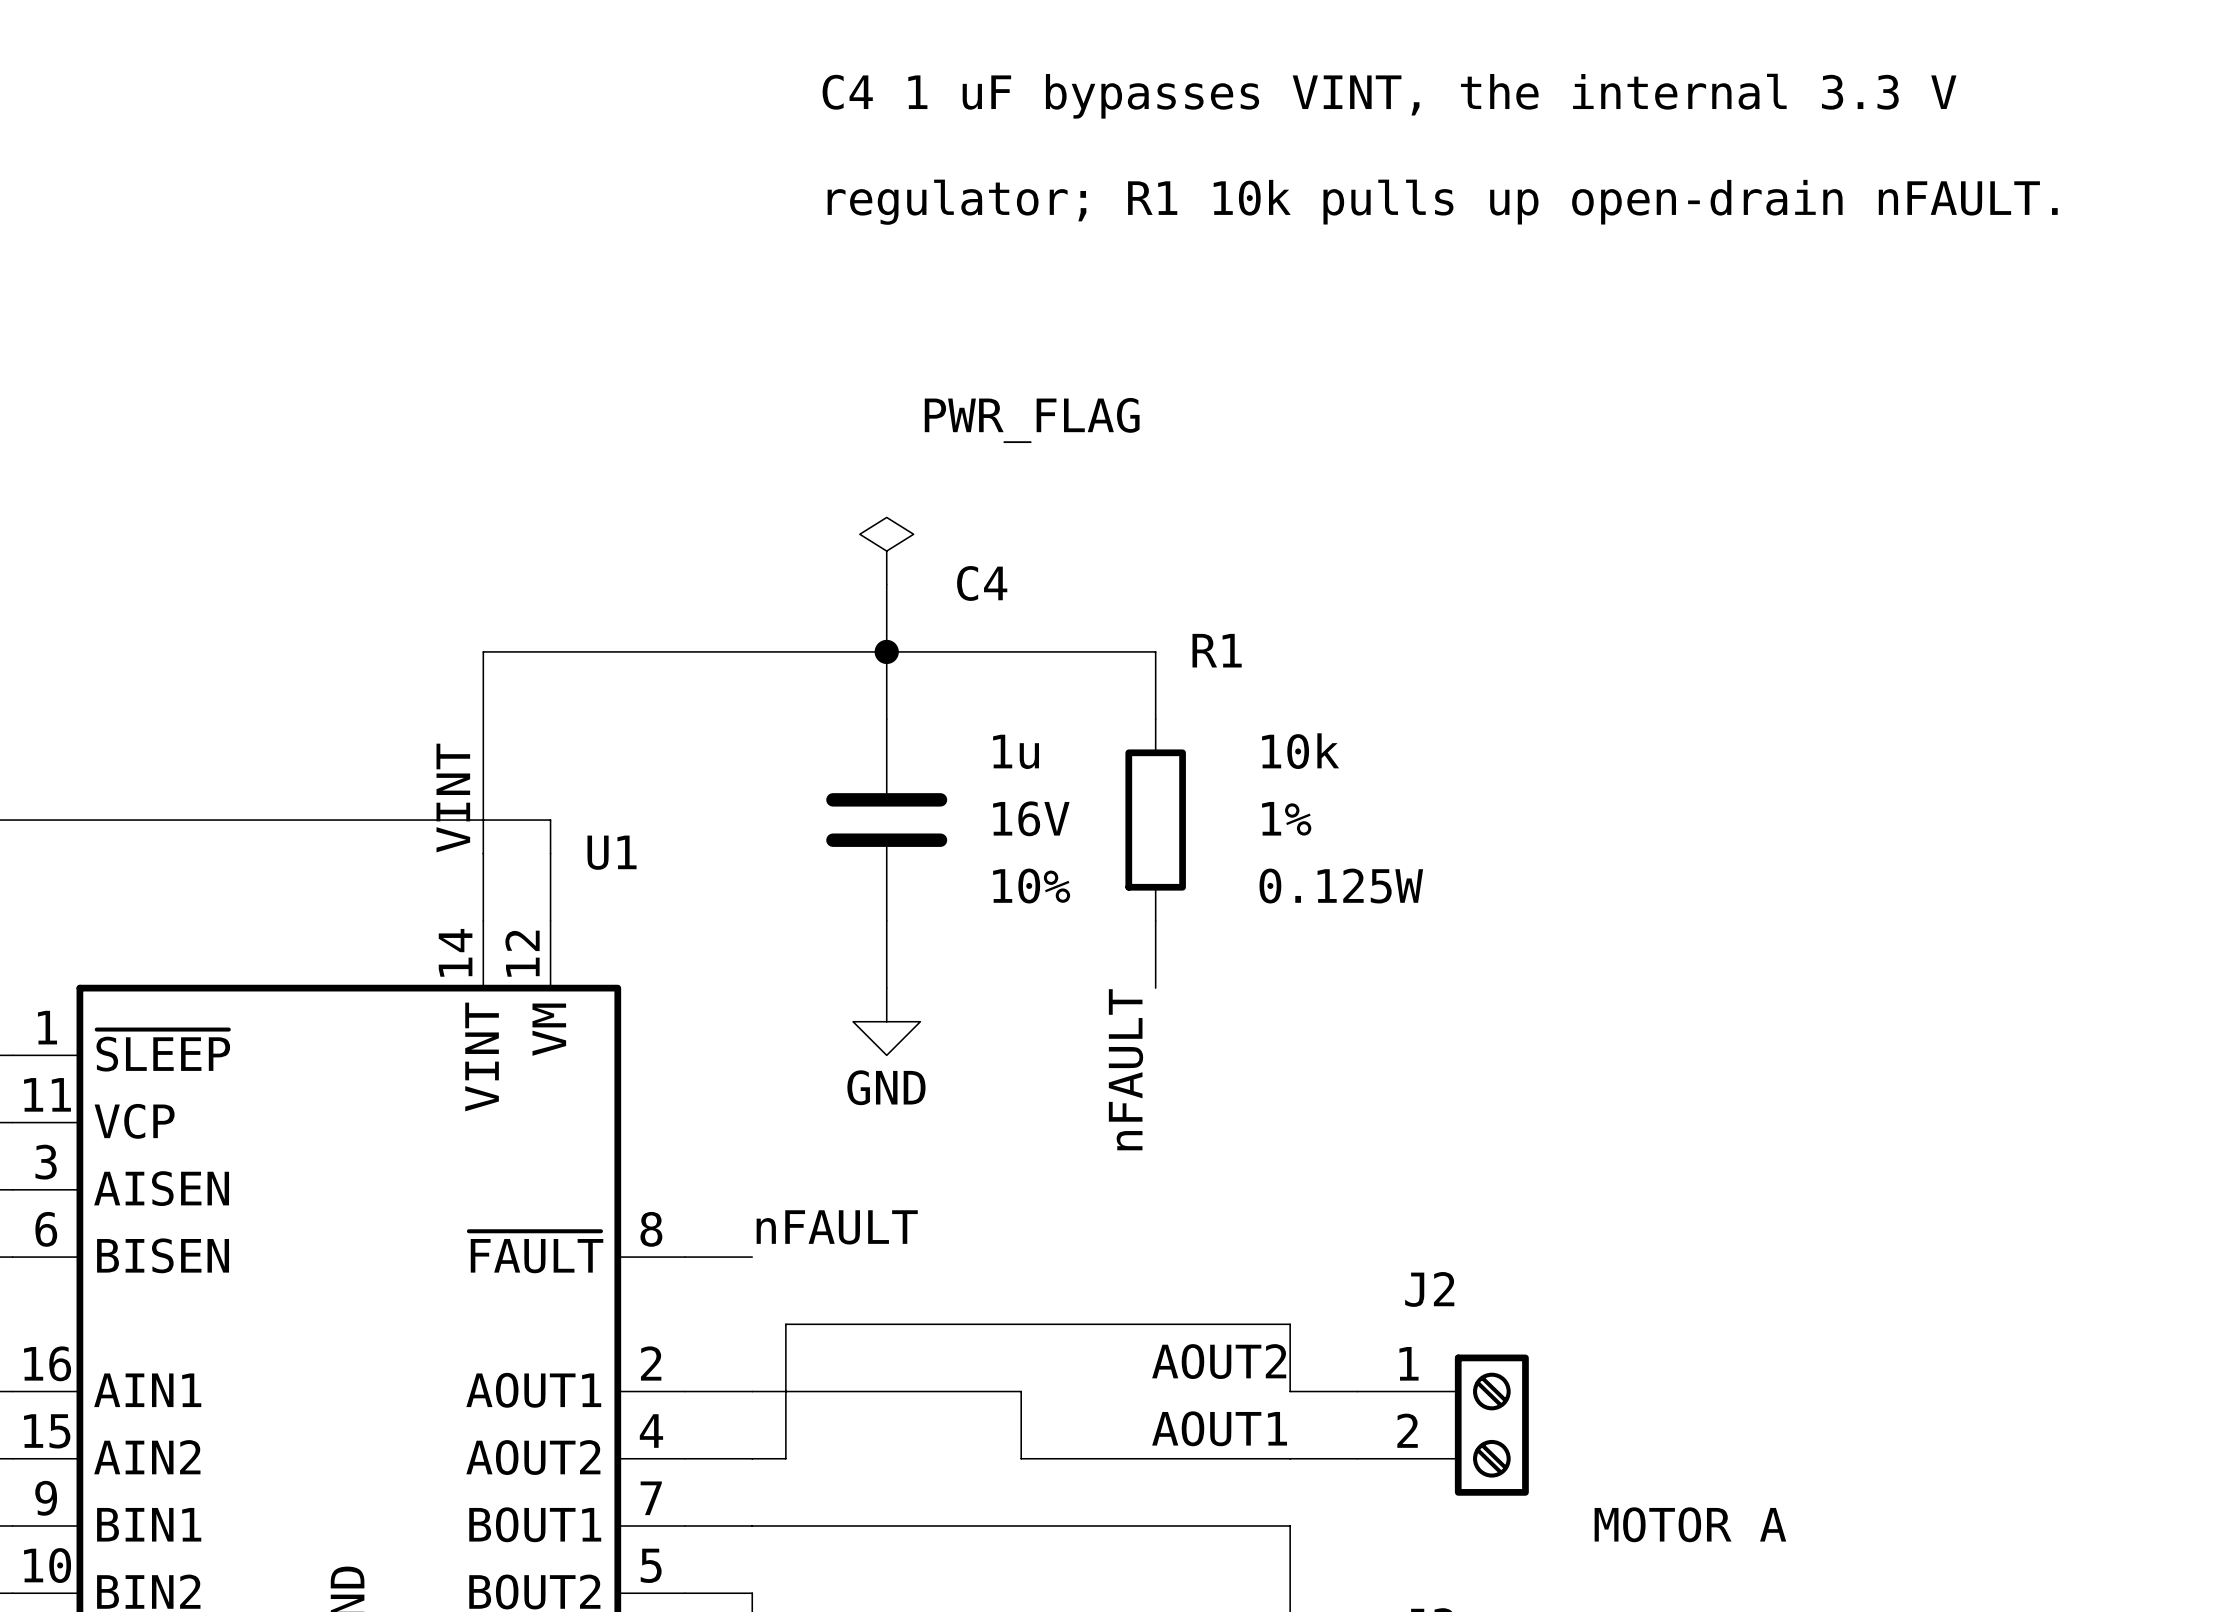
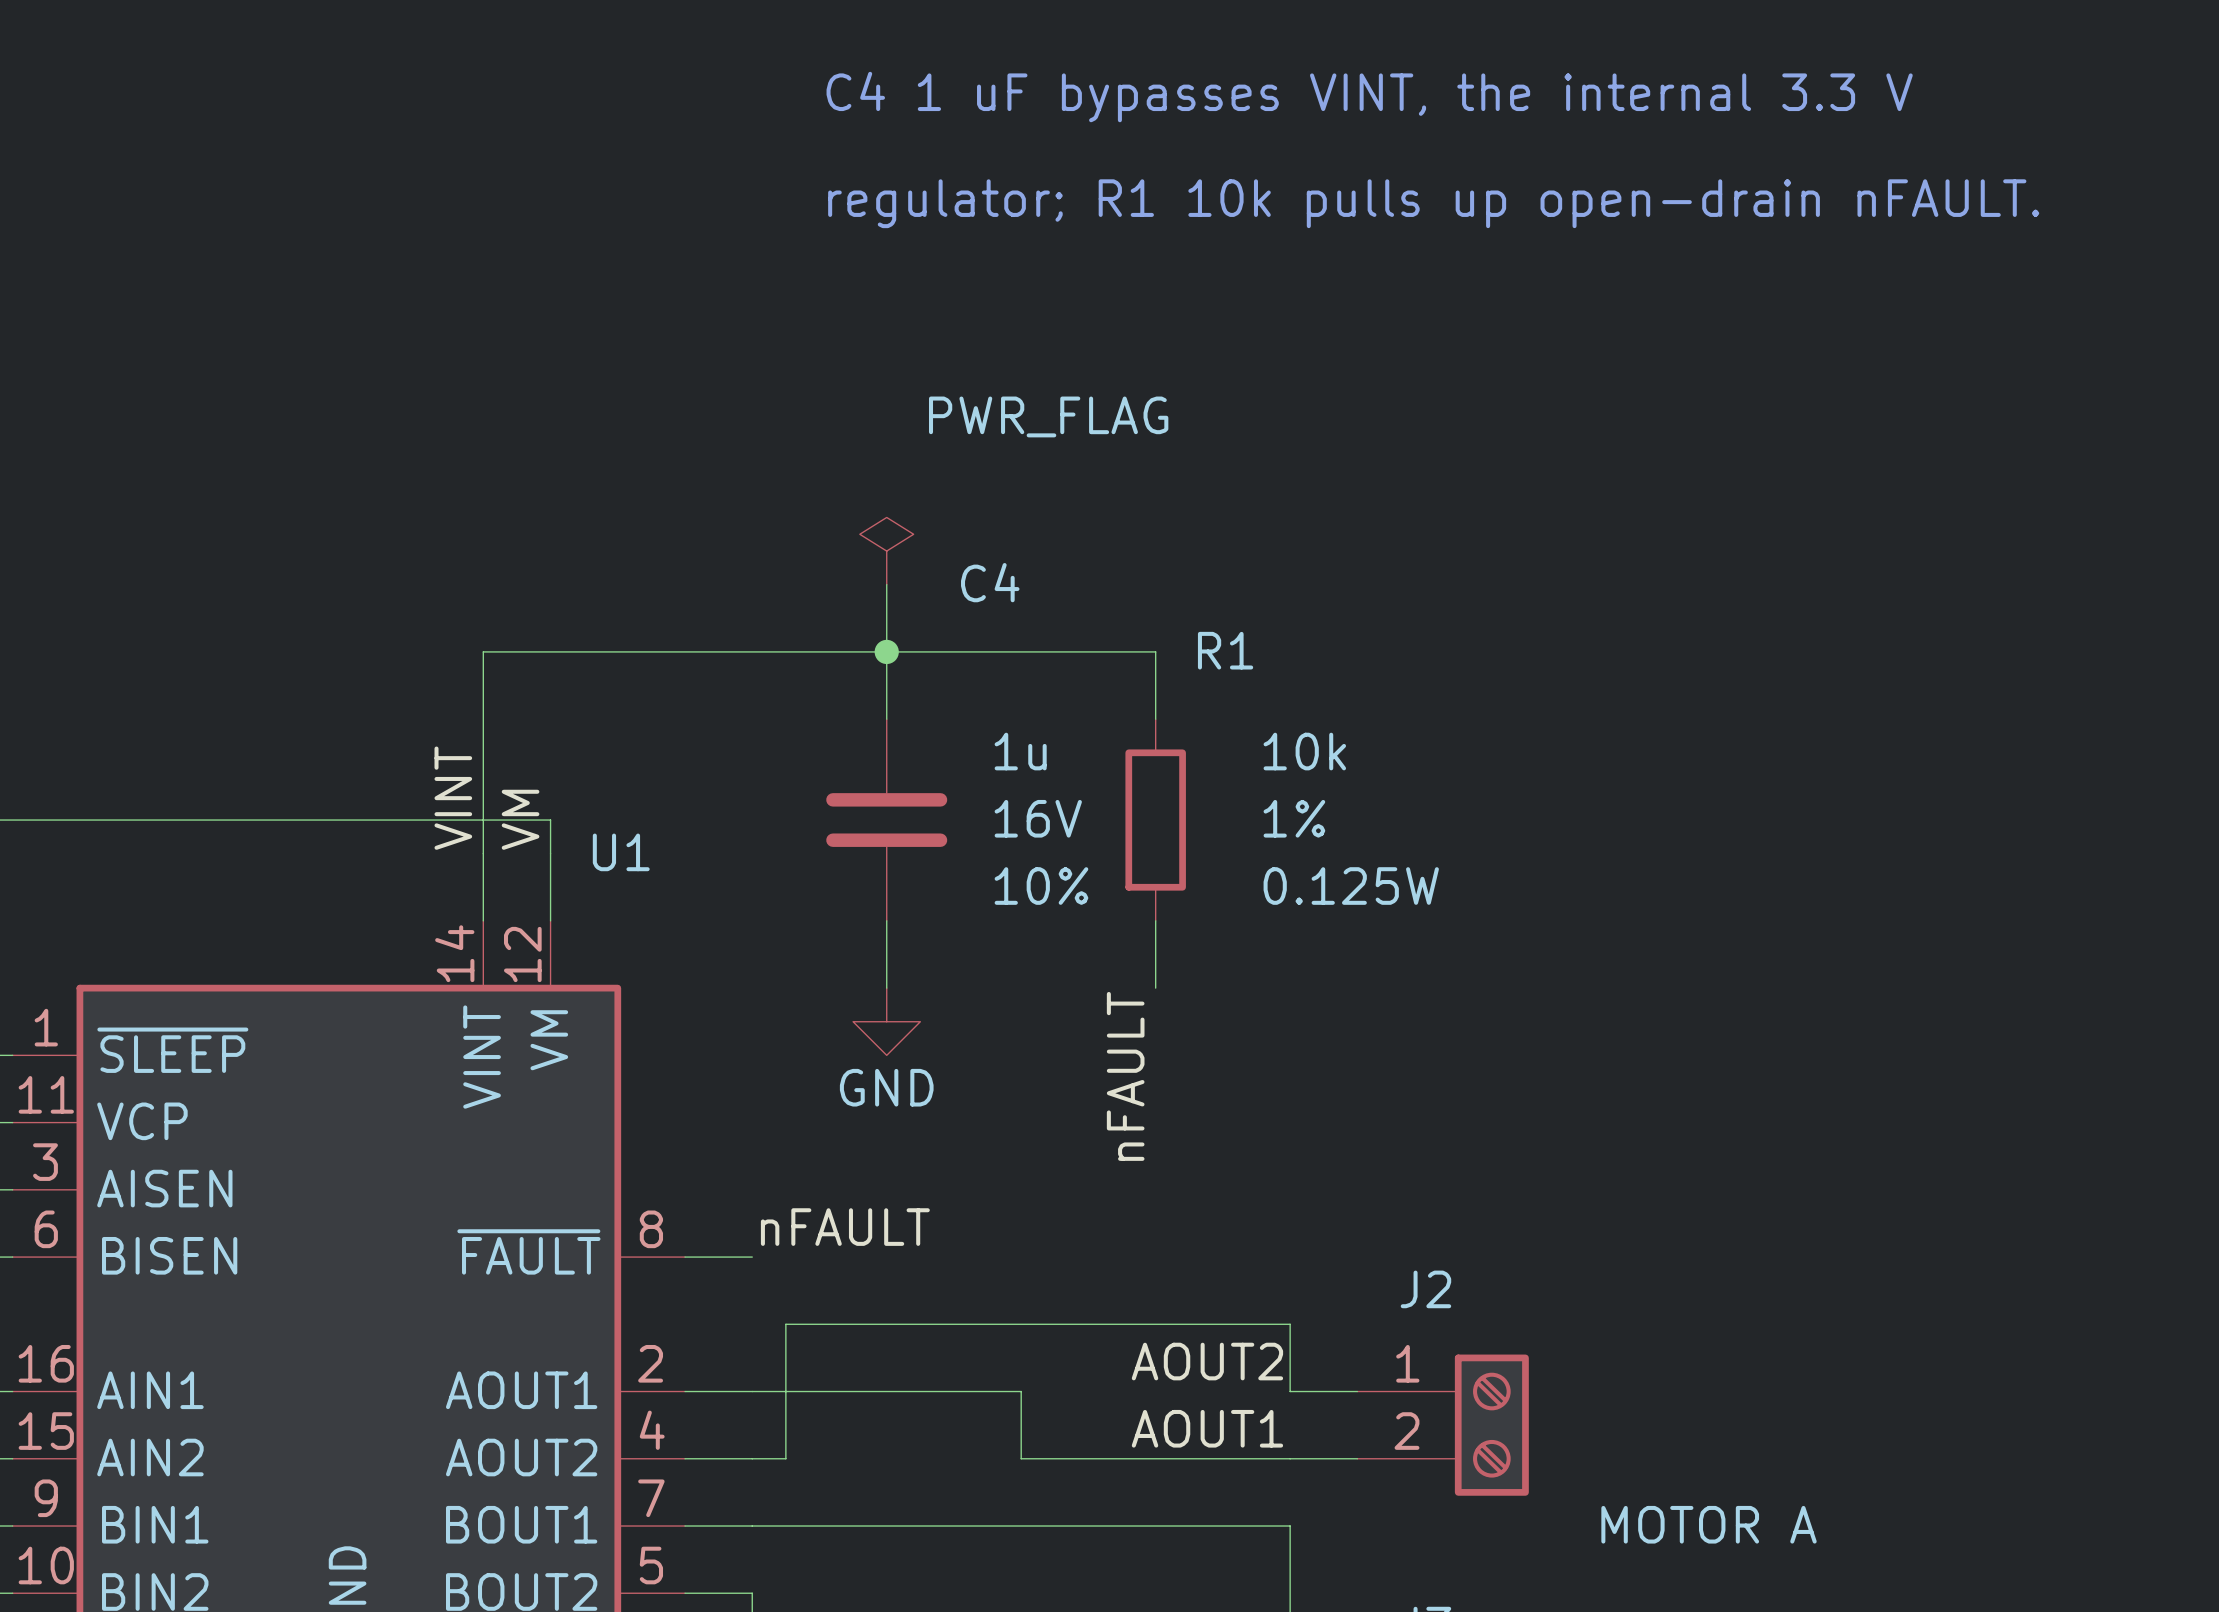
label: none -> VM (520, 819)

